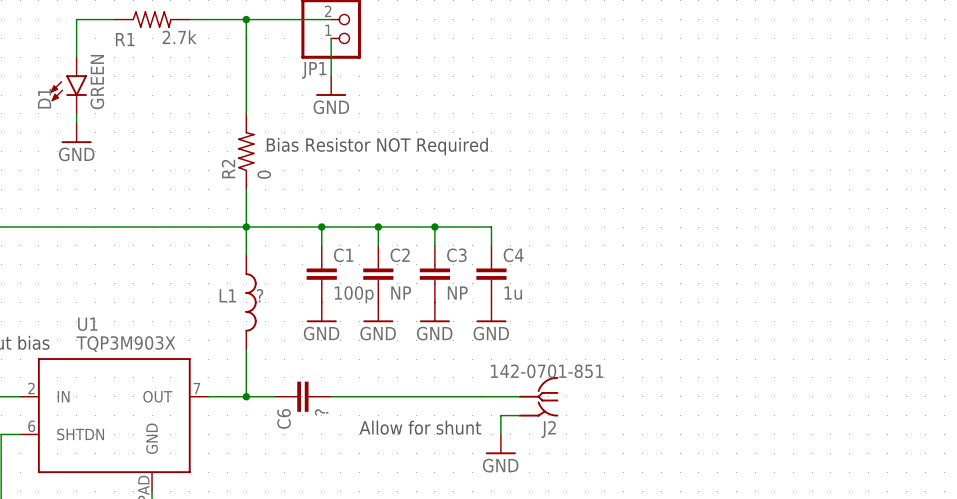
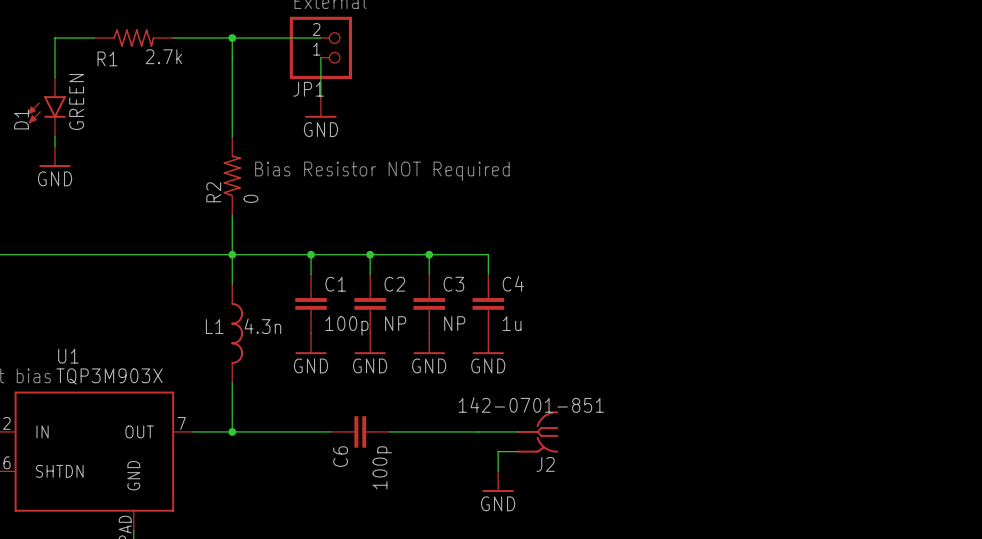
L1 value: ? (260, 295) -> 4.3n (262, 326)
C6 position: (302, 396) -> (360, 431)
C6 value: ? (321, 412) -> 100p (382, 467)
text: Allow for shunt (420, 427) -> none

